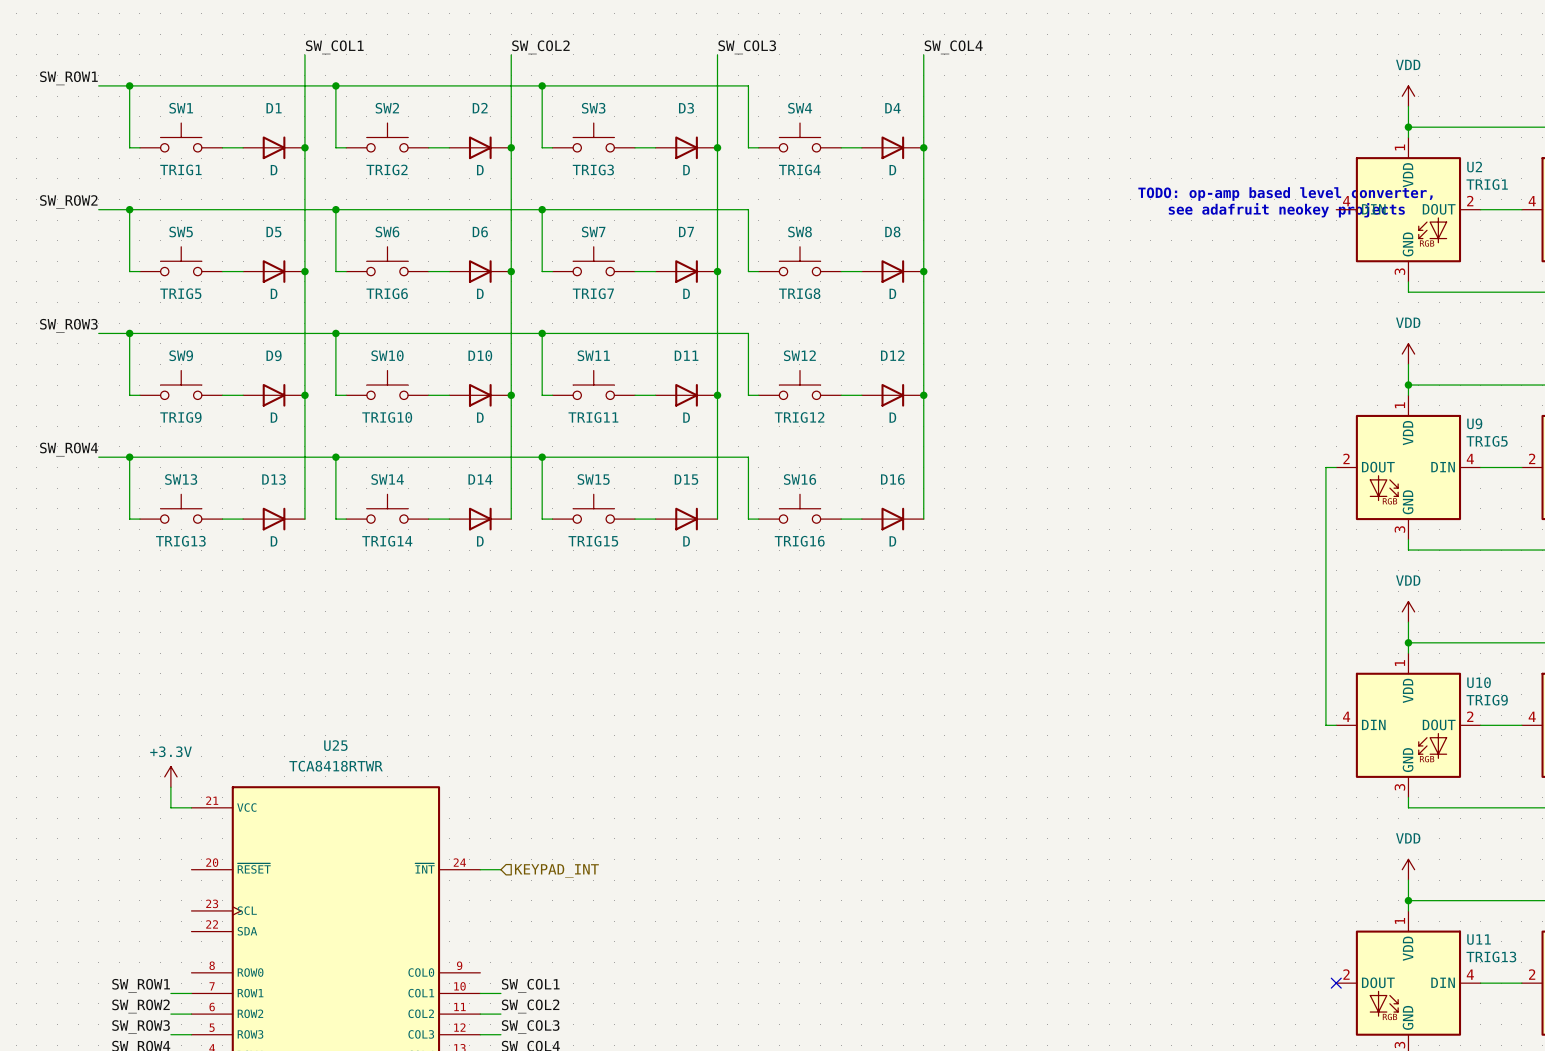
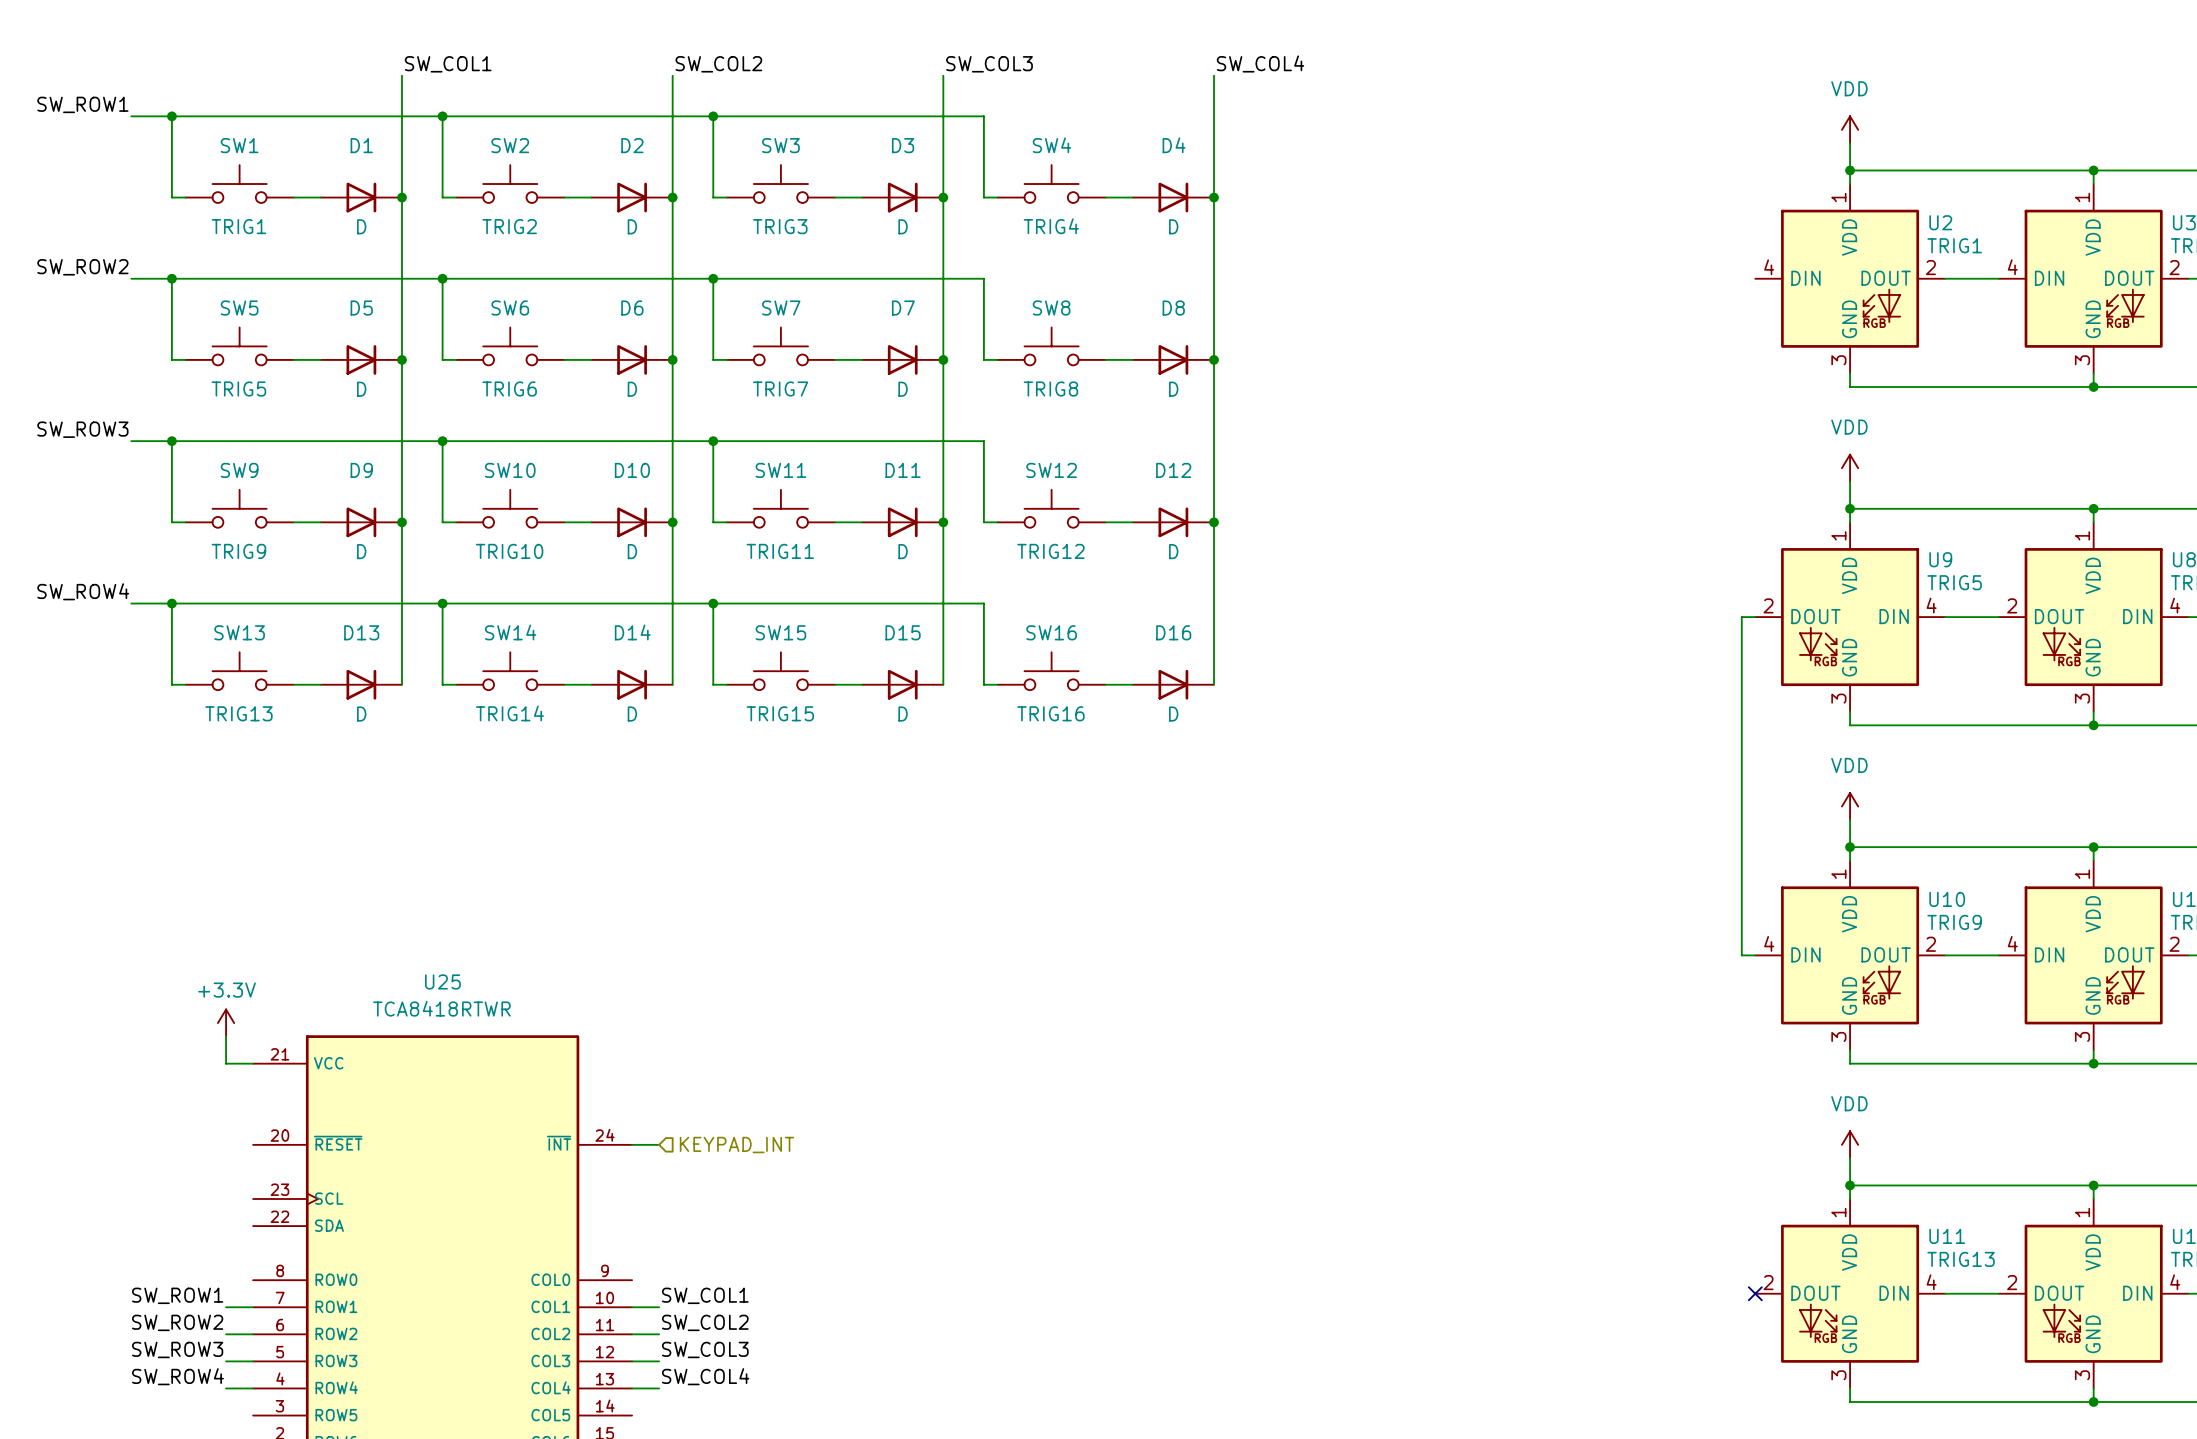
text: TODO: op-amp based level converter, (1285, 194) -> none
text: see adafruit neokey projects (1286, 210) -> none

